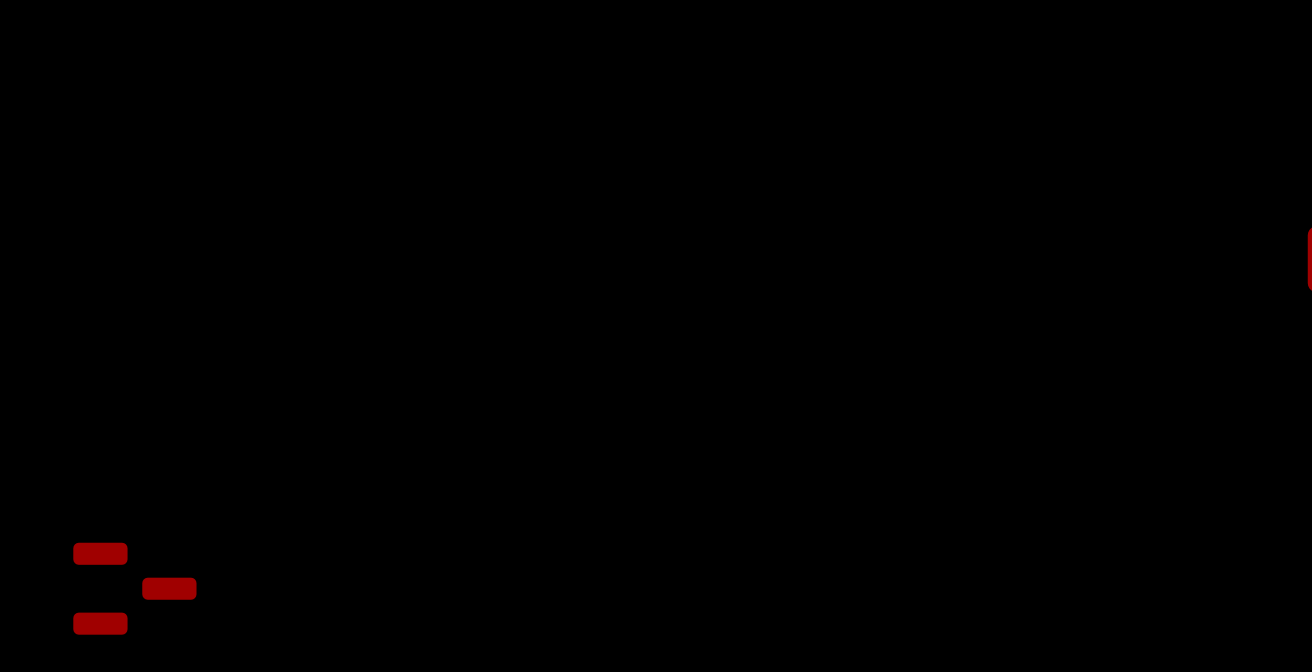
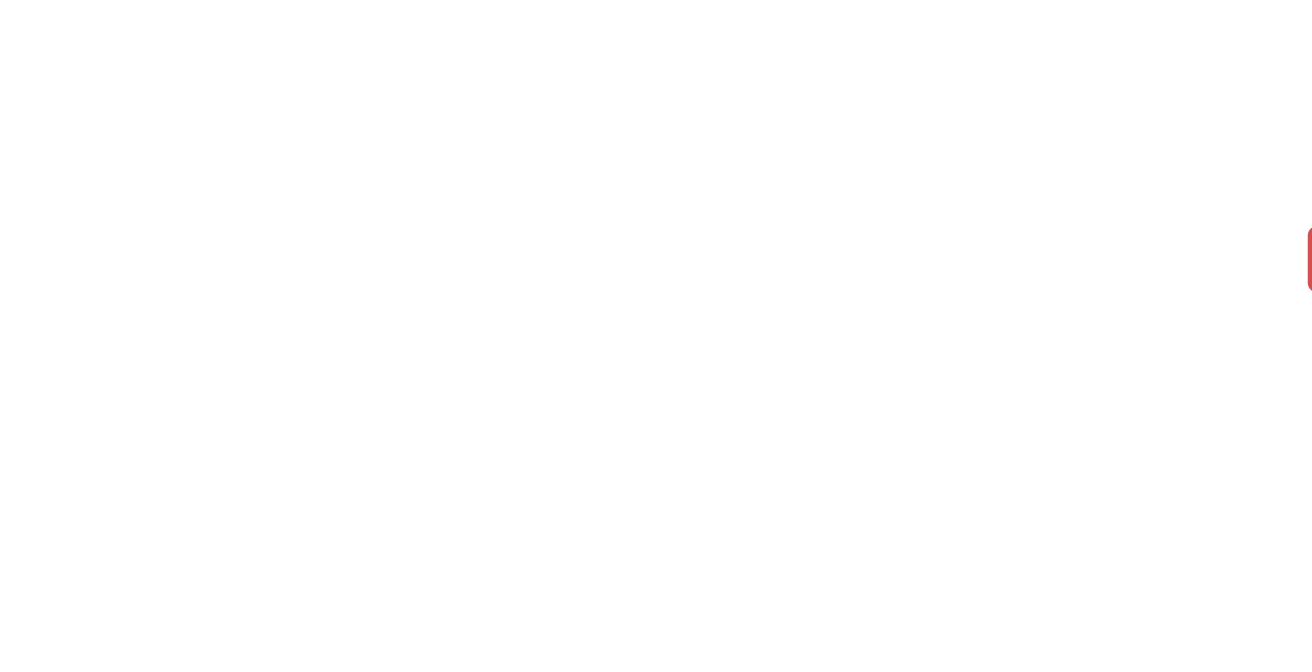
part: (134, 588) -> none

